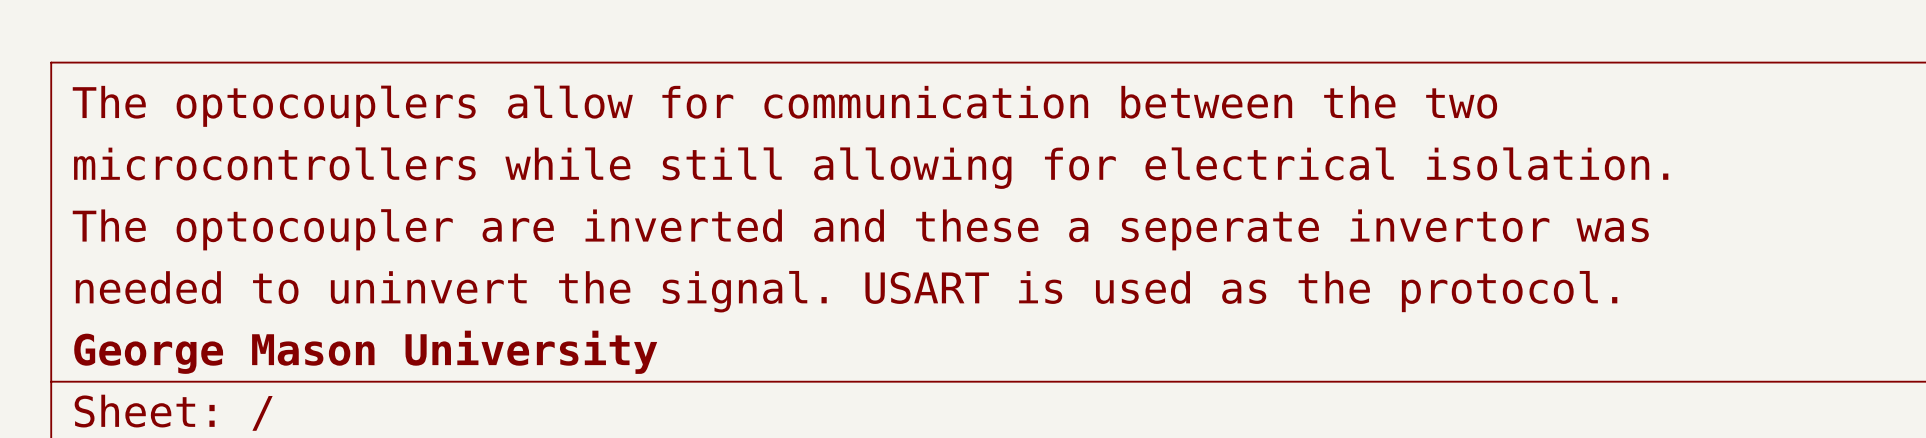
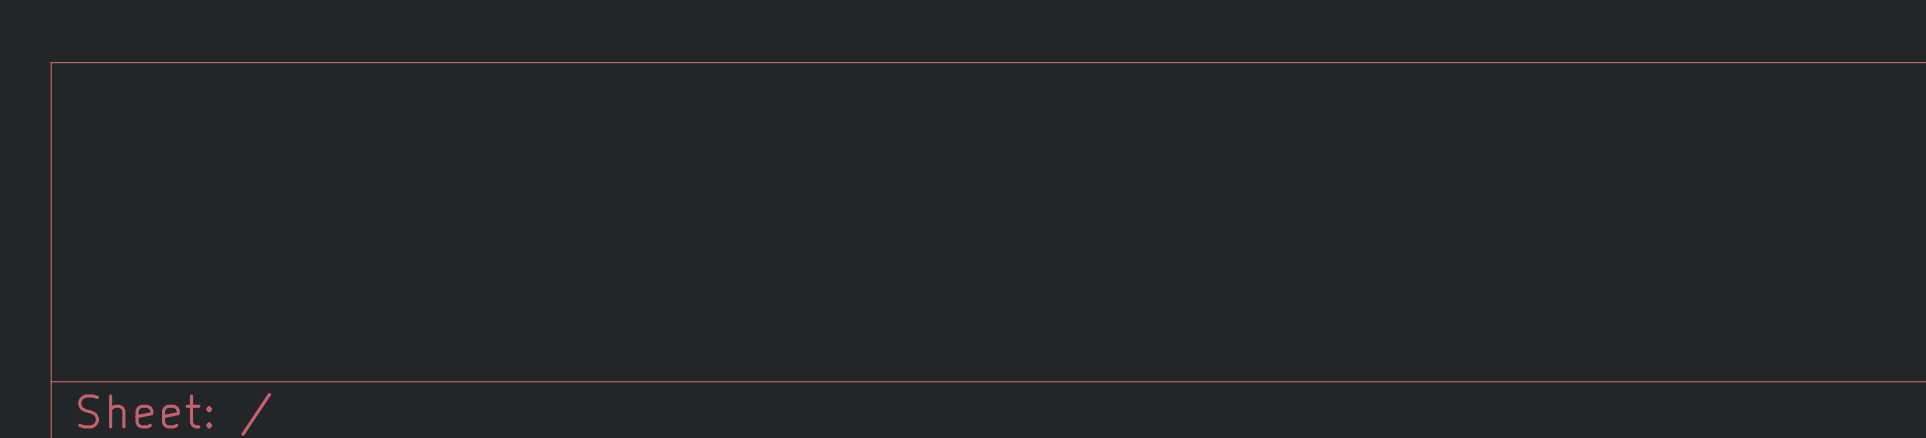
title block: The optocouplers allow for communication between the two (784, 106) -> none
title block: microcontrollers while still allowing for electrical isolation. (871, 168) -> none
title block: The optocoupler are inverted and these a seperate invertor was (860, 229) -> none
title block: needed to uninvert the signal. USART is used as the protocol. (846, 291) -> none
title block: George Mason University (365, 352) -> none

